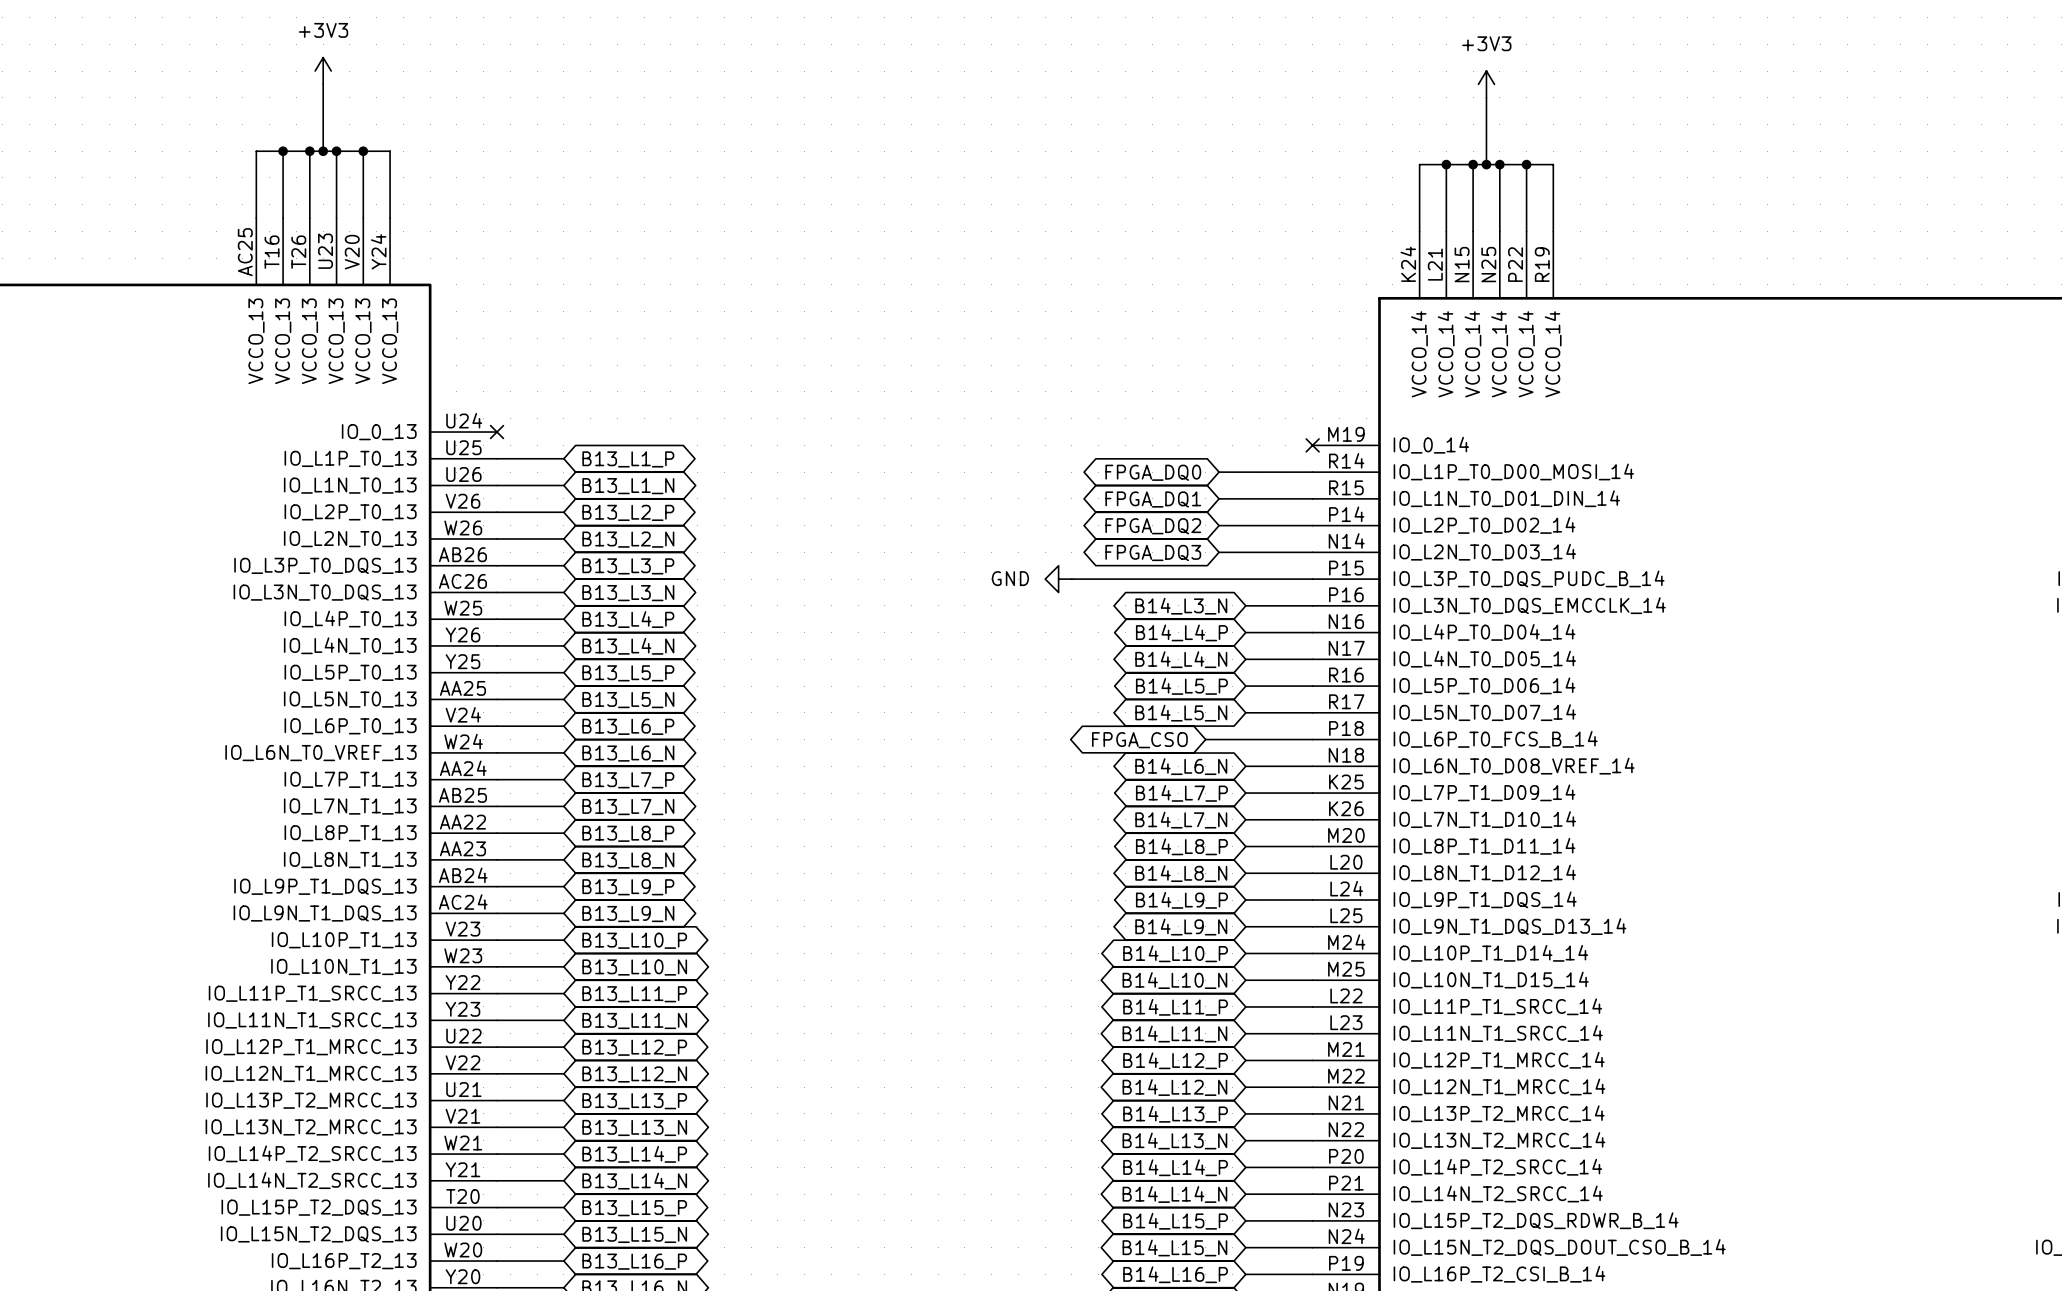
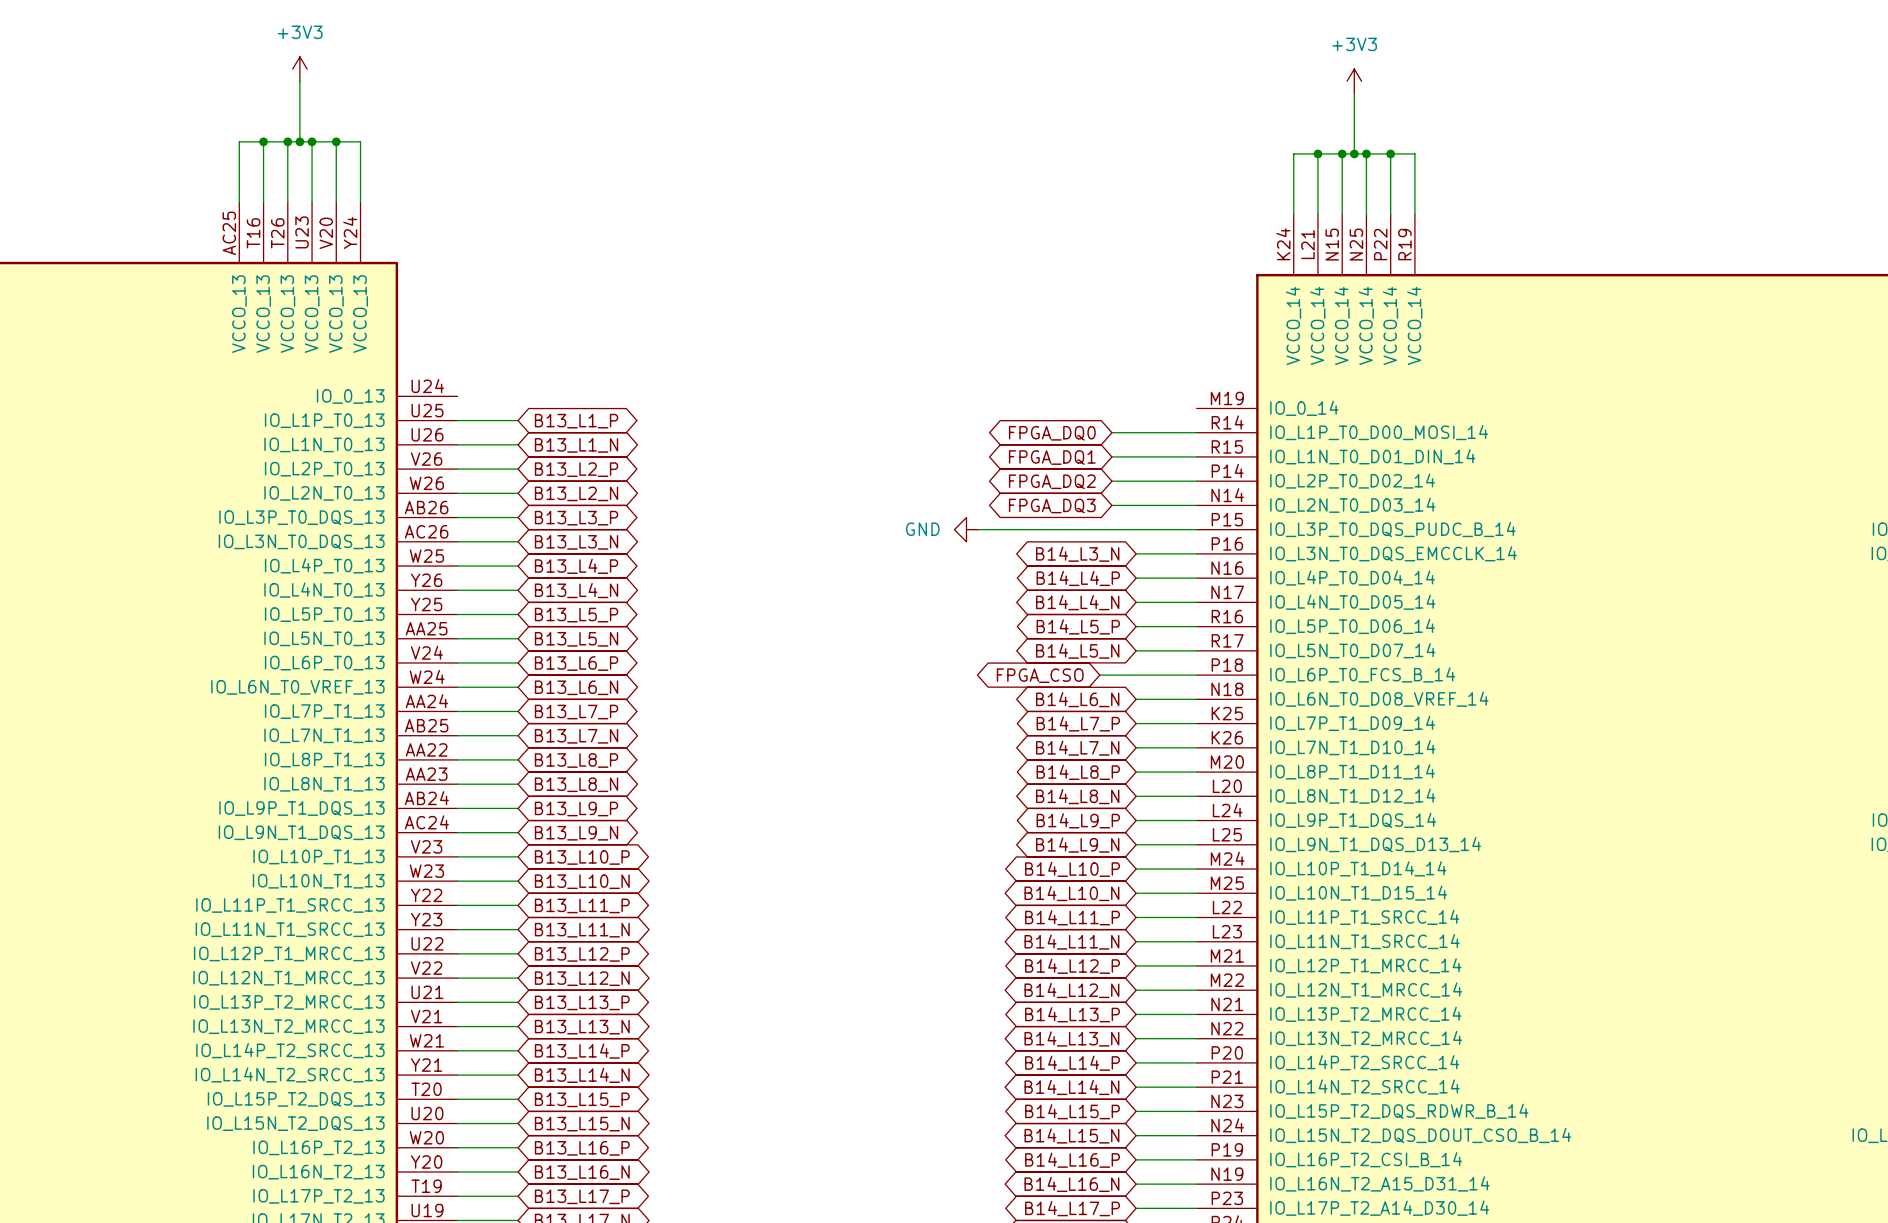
no-connect mark: (497, 432) -> none
no-connect mark: (1312, 445) -> none

